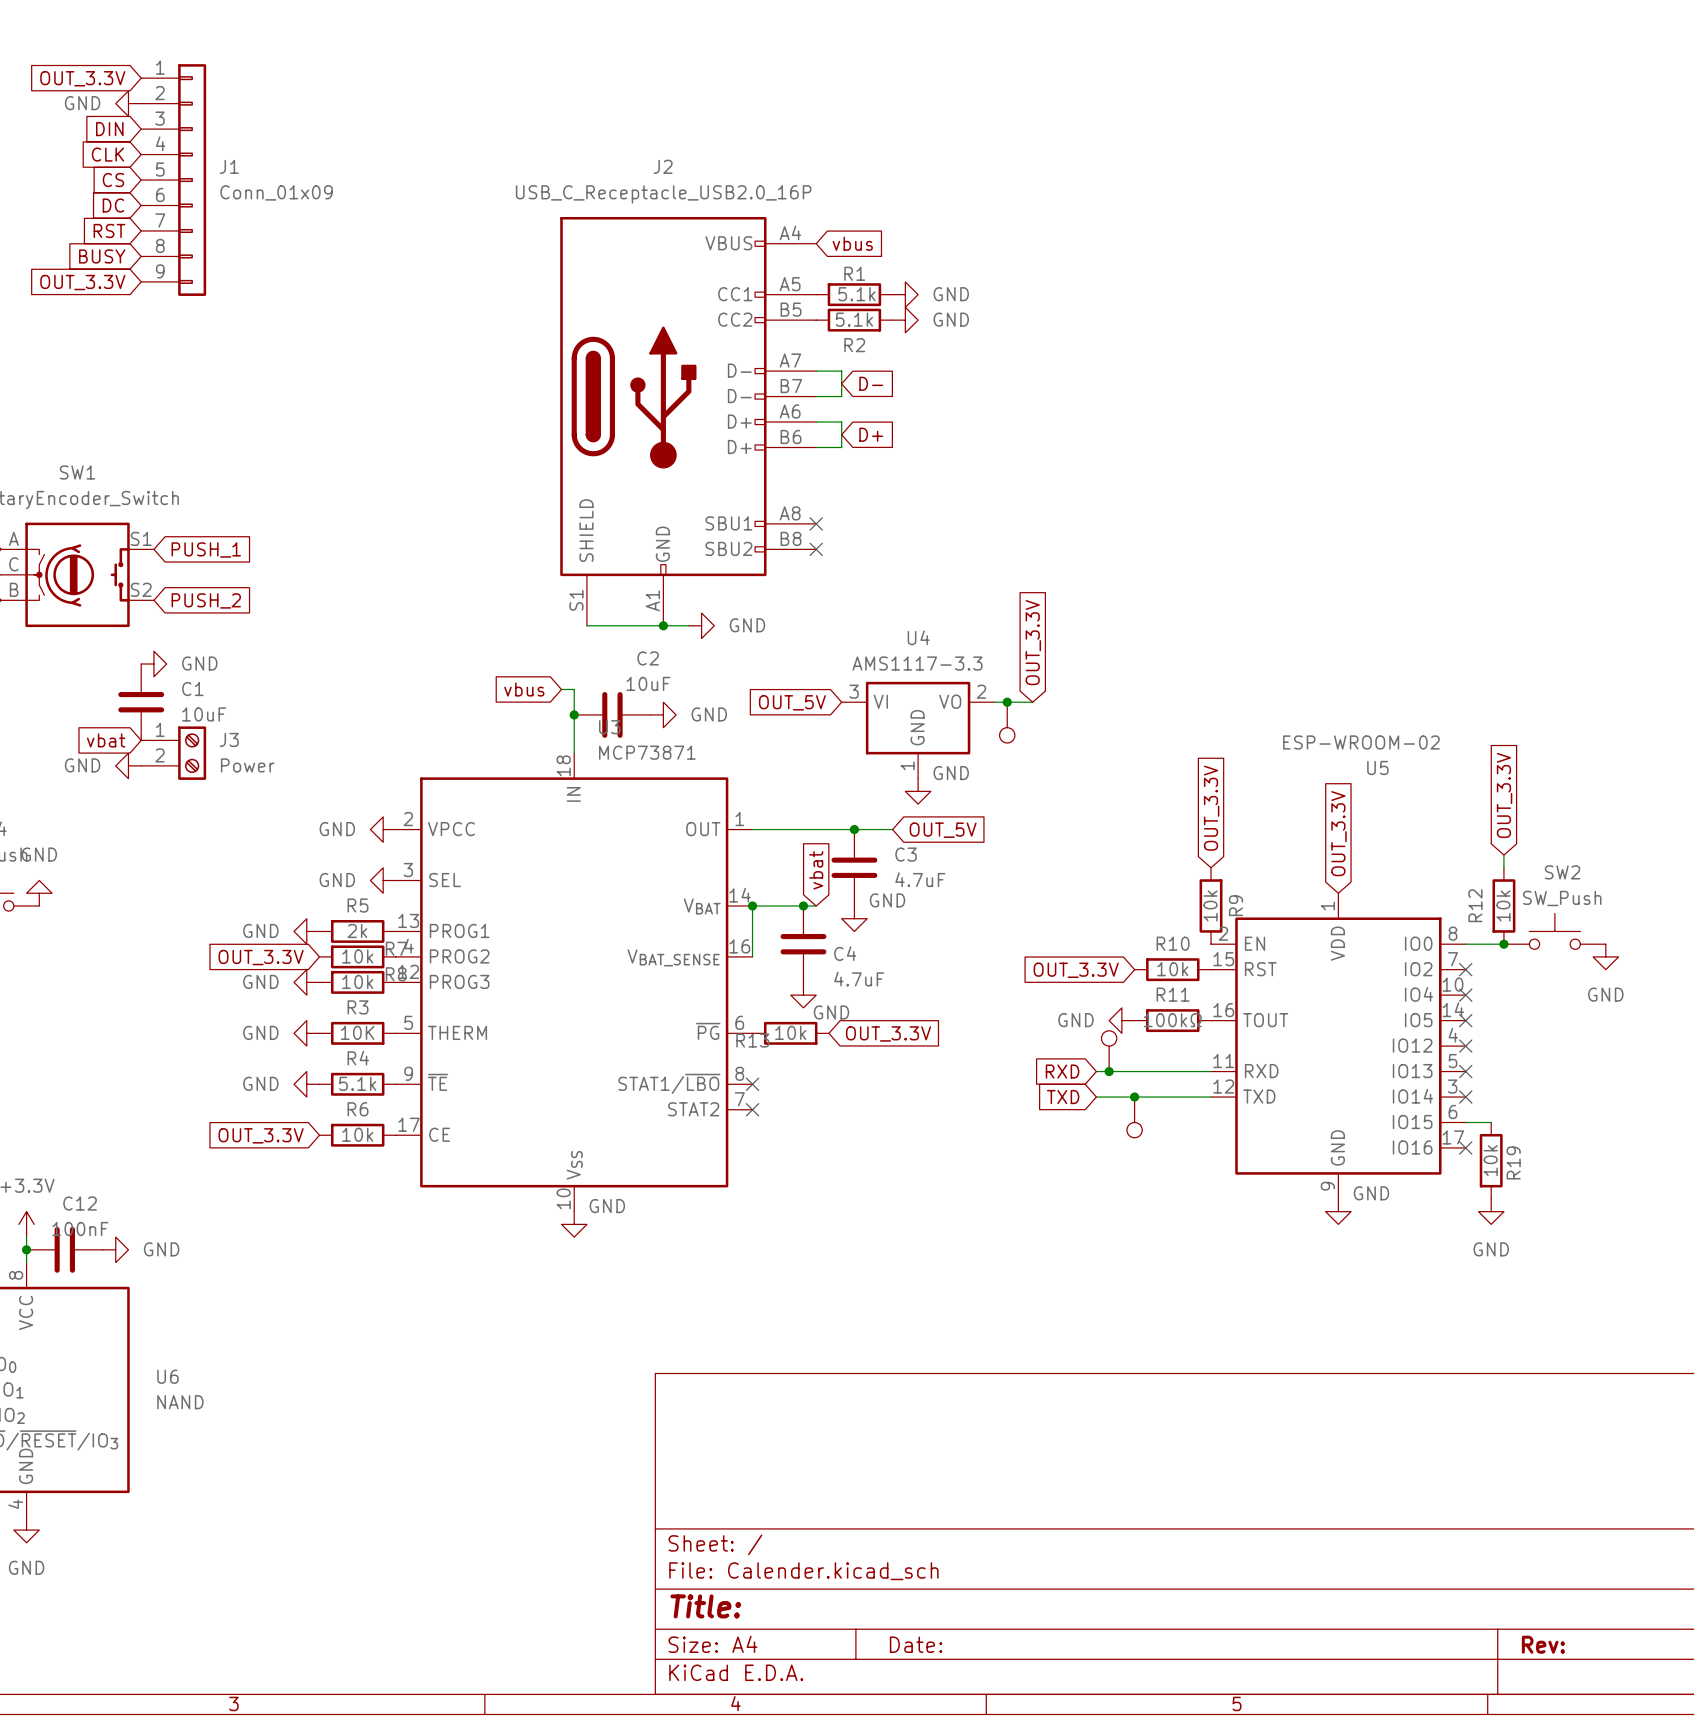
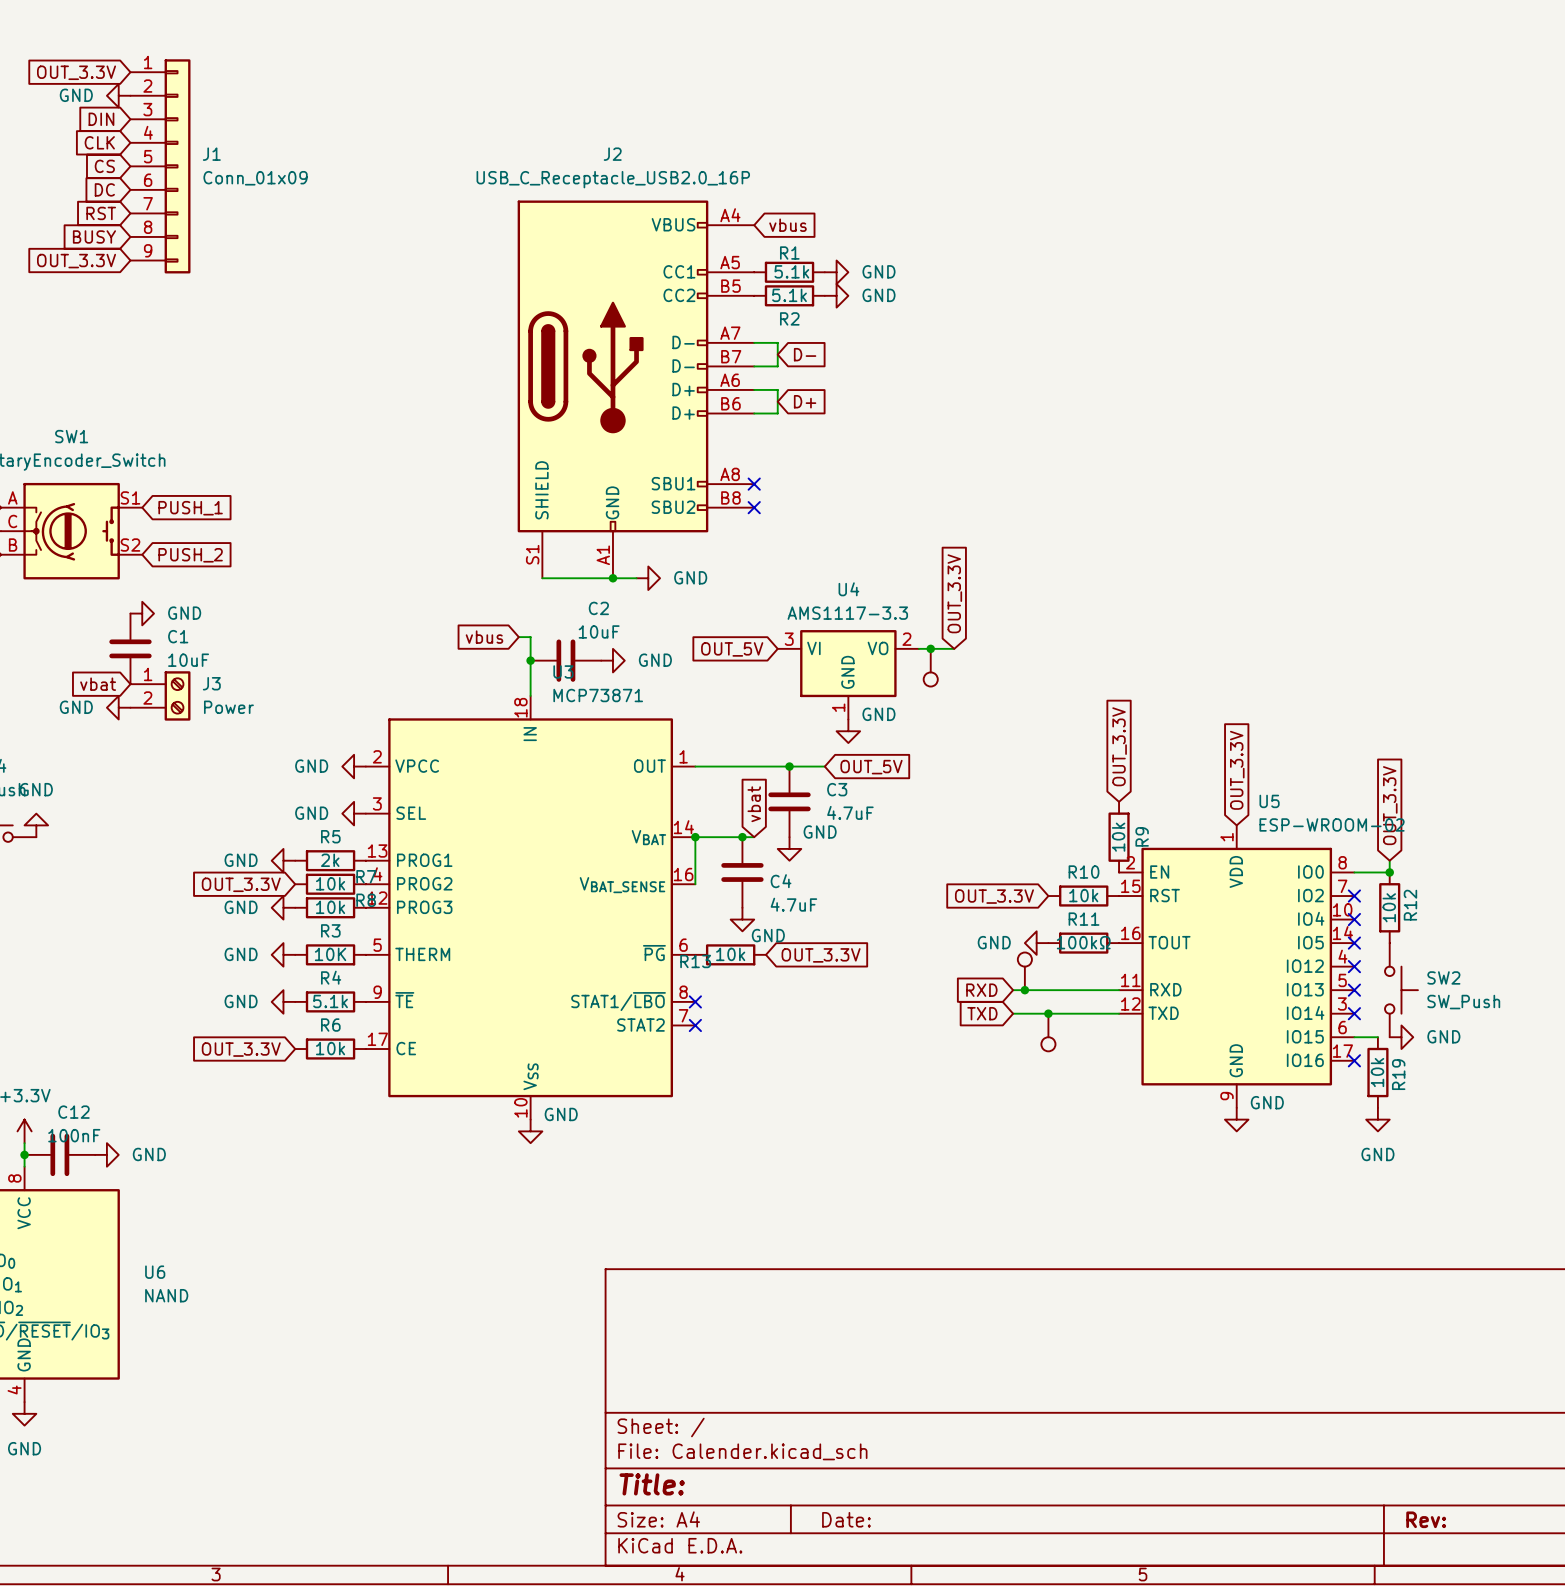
U5 value position: ESP-WROOM-02 (1361, 742) -> ESP-WROOM-02 (1332, 824)
U5 name position: U5 (1377, 767) -> U5 (1269, 801)
global label position: OUT_3.3V (1504, 795) -> OUT_3.3V (1390, 805)
SW2 name position: SW2 (1562, 872) -> SW2 (1443, 977)
SW2 value position: SW_Push (1562, 898) -> SW_Push (1463, 1002)
R12 name position: R12 (1475, 905) -> R12 (1410, 905)
R12 position: (1503, 905) -> (1389, 907)
SW2 rotation: 0° (1554, 931) -> 90° clockwise (1401, 990)
SW2 position: (1554, 931) -> (1401, 990)
power symbol rotation: 0° (1605, 956) -> 90° counterclockwise (1401, 1037)
power symbol position: GND (1605, 956) -> GND (1401, 1037)

